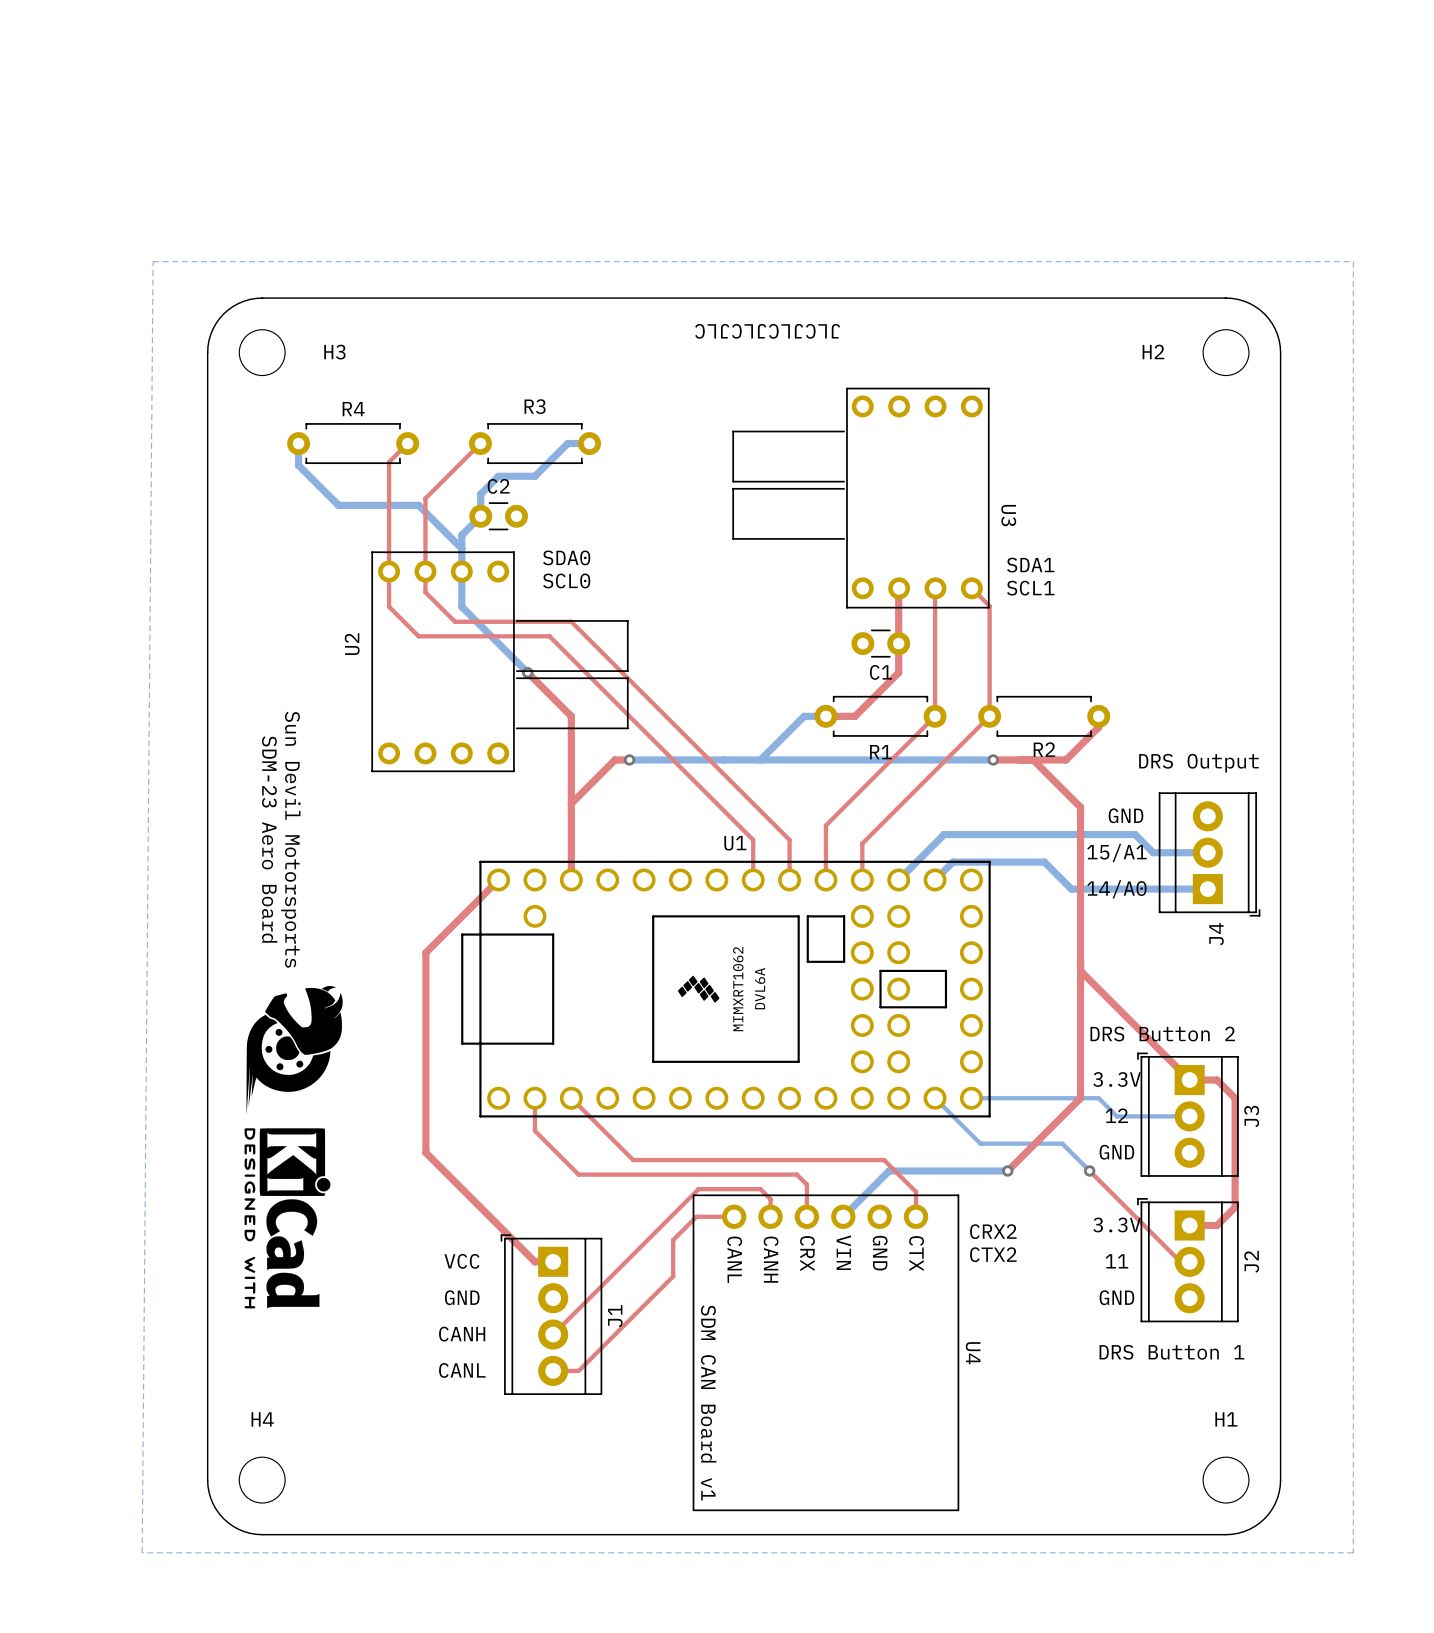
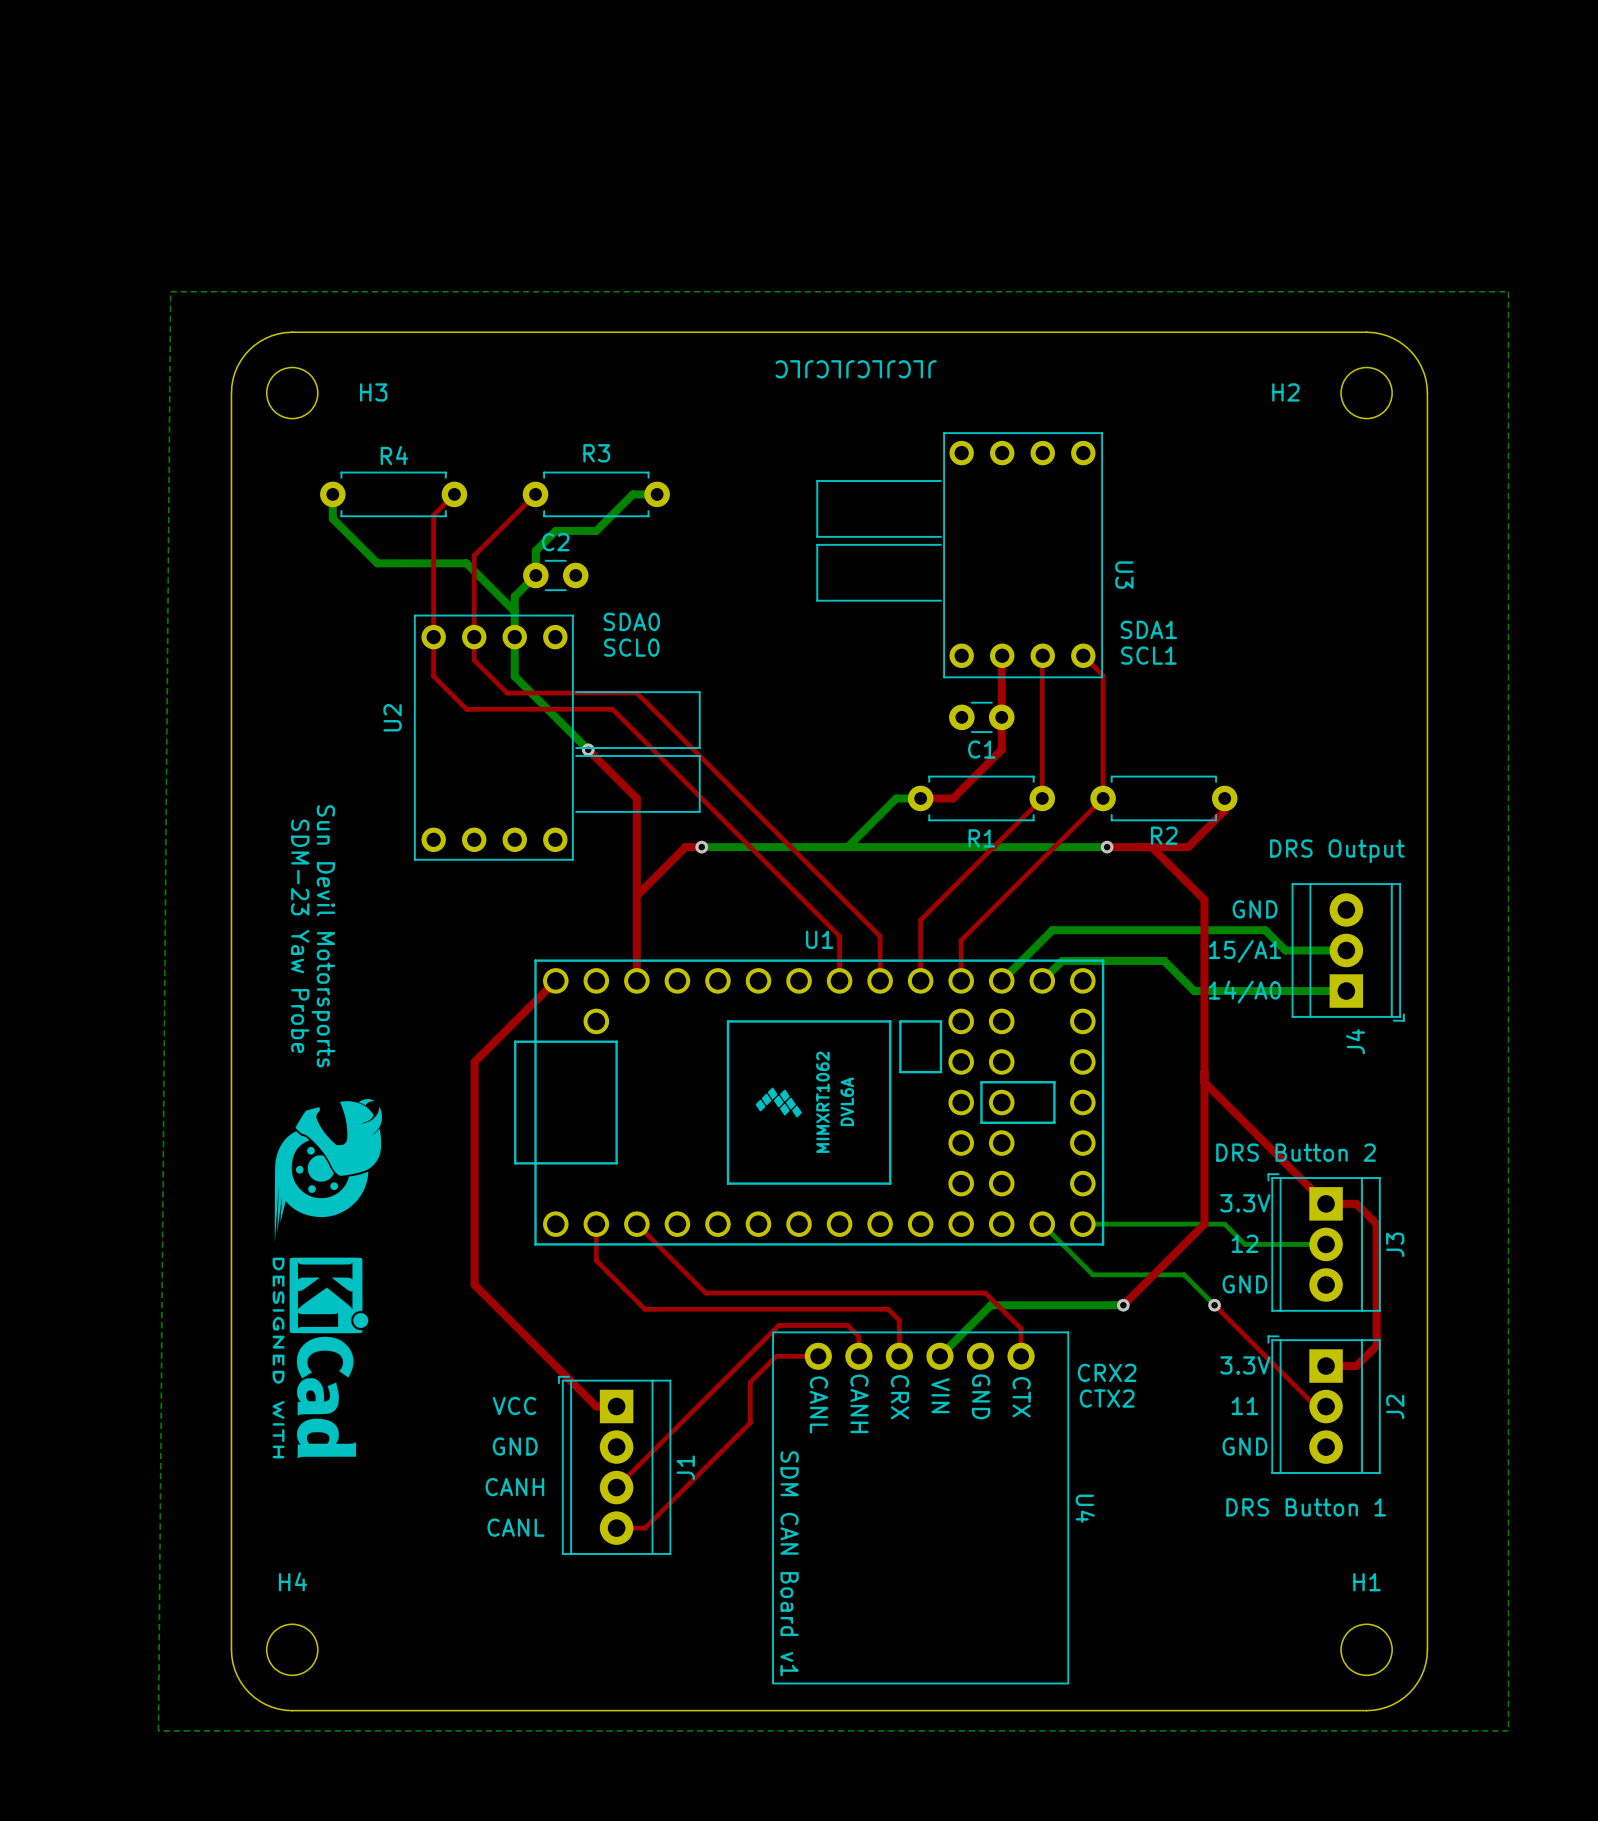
text: SDM-23 Aero Board (269, 839) -> SDM-23 Yaw Probe (300, 936)

